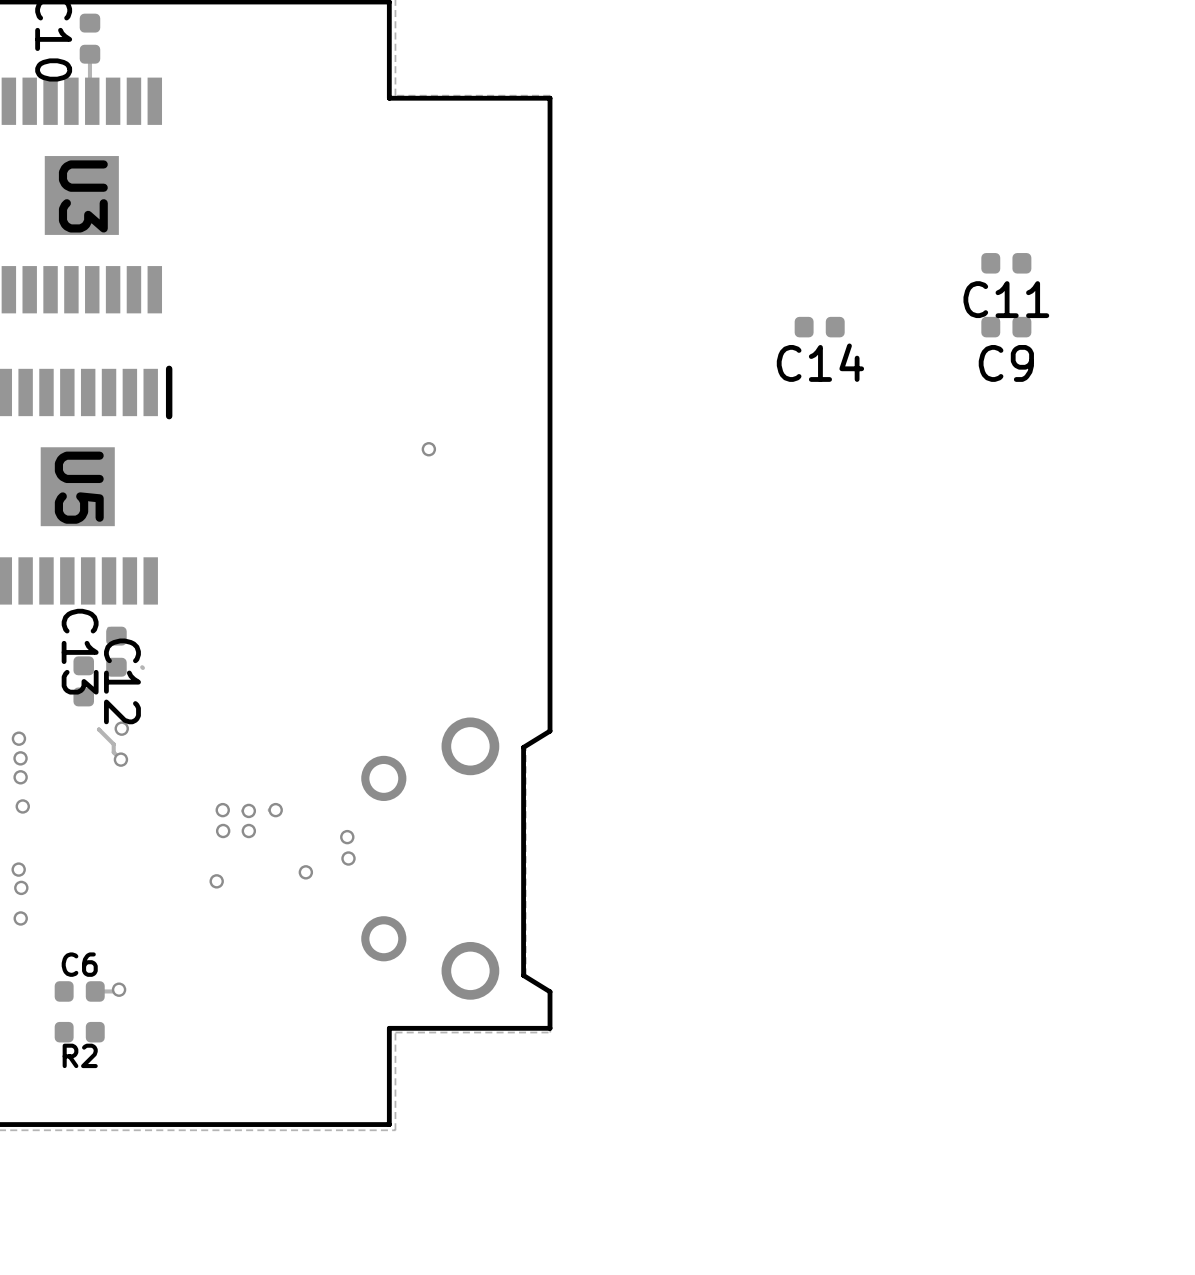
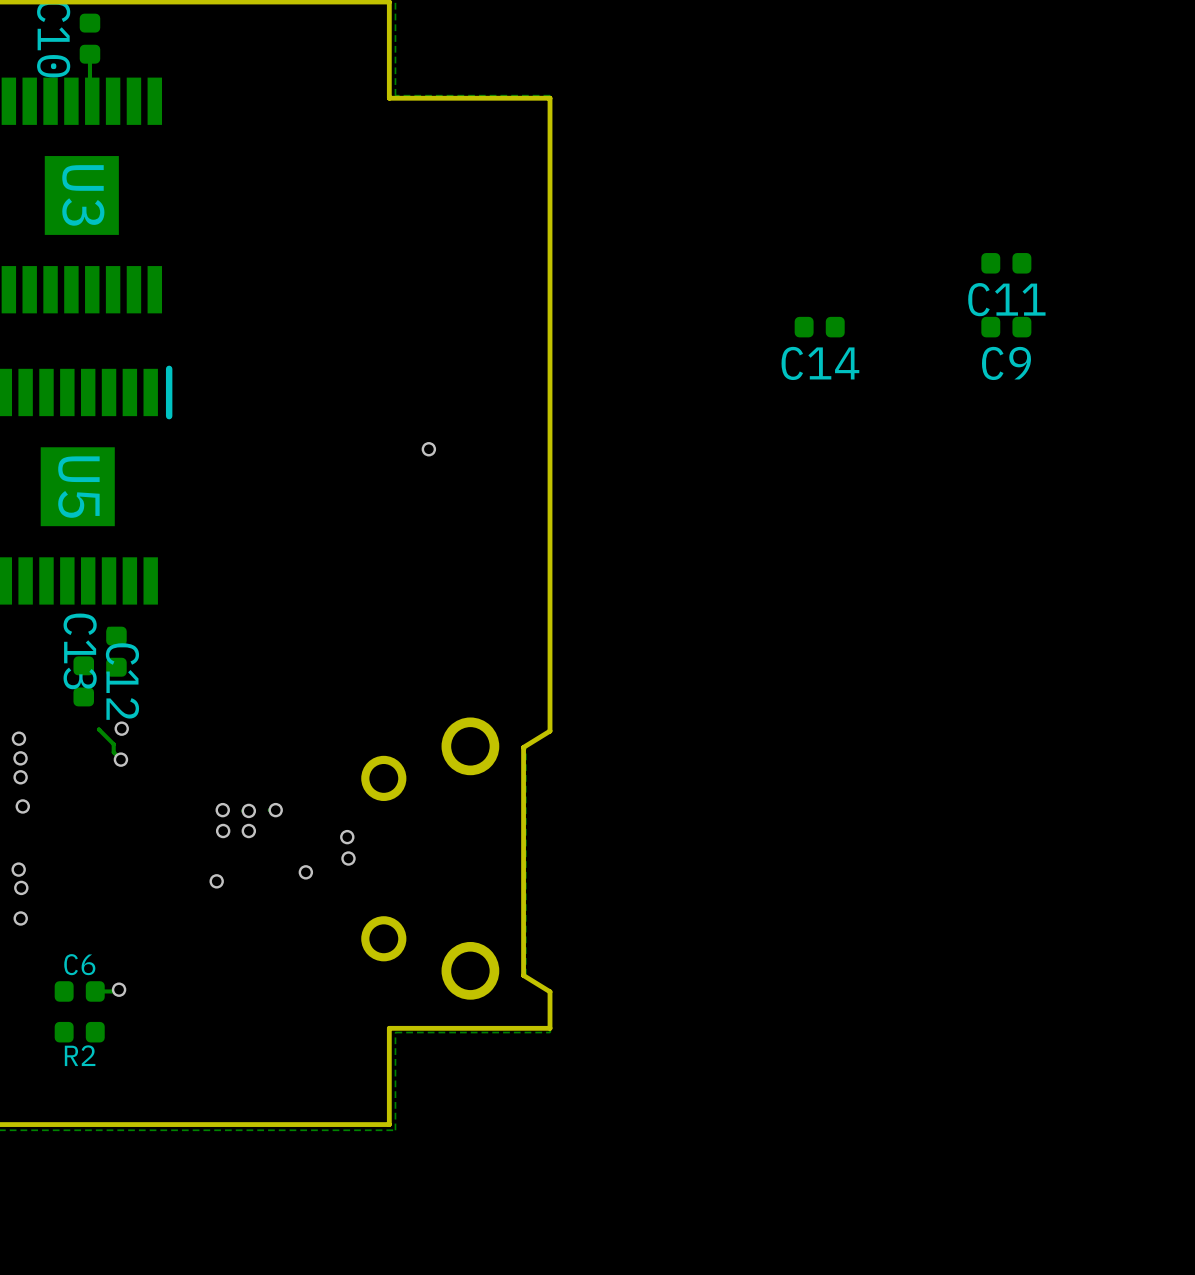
track: (142, 667) (142, 667) -> none

